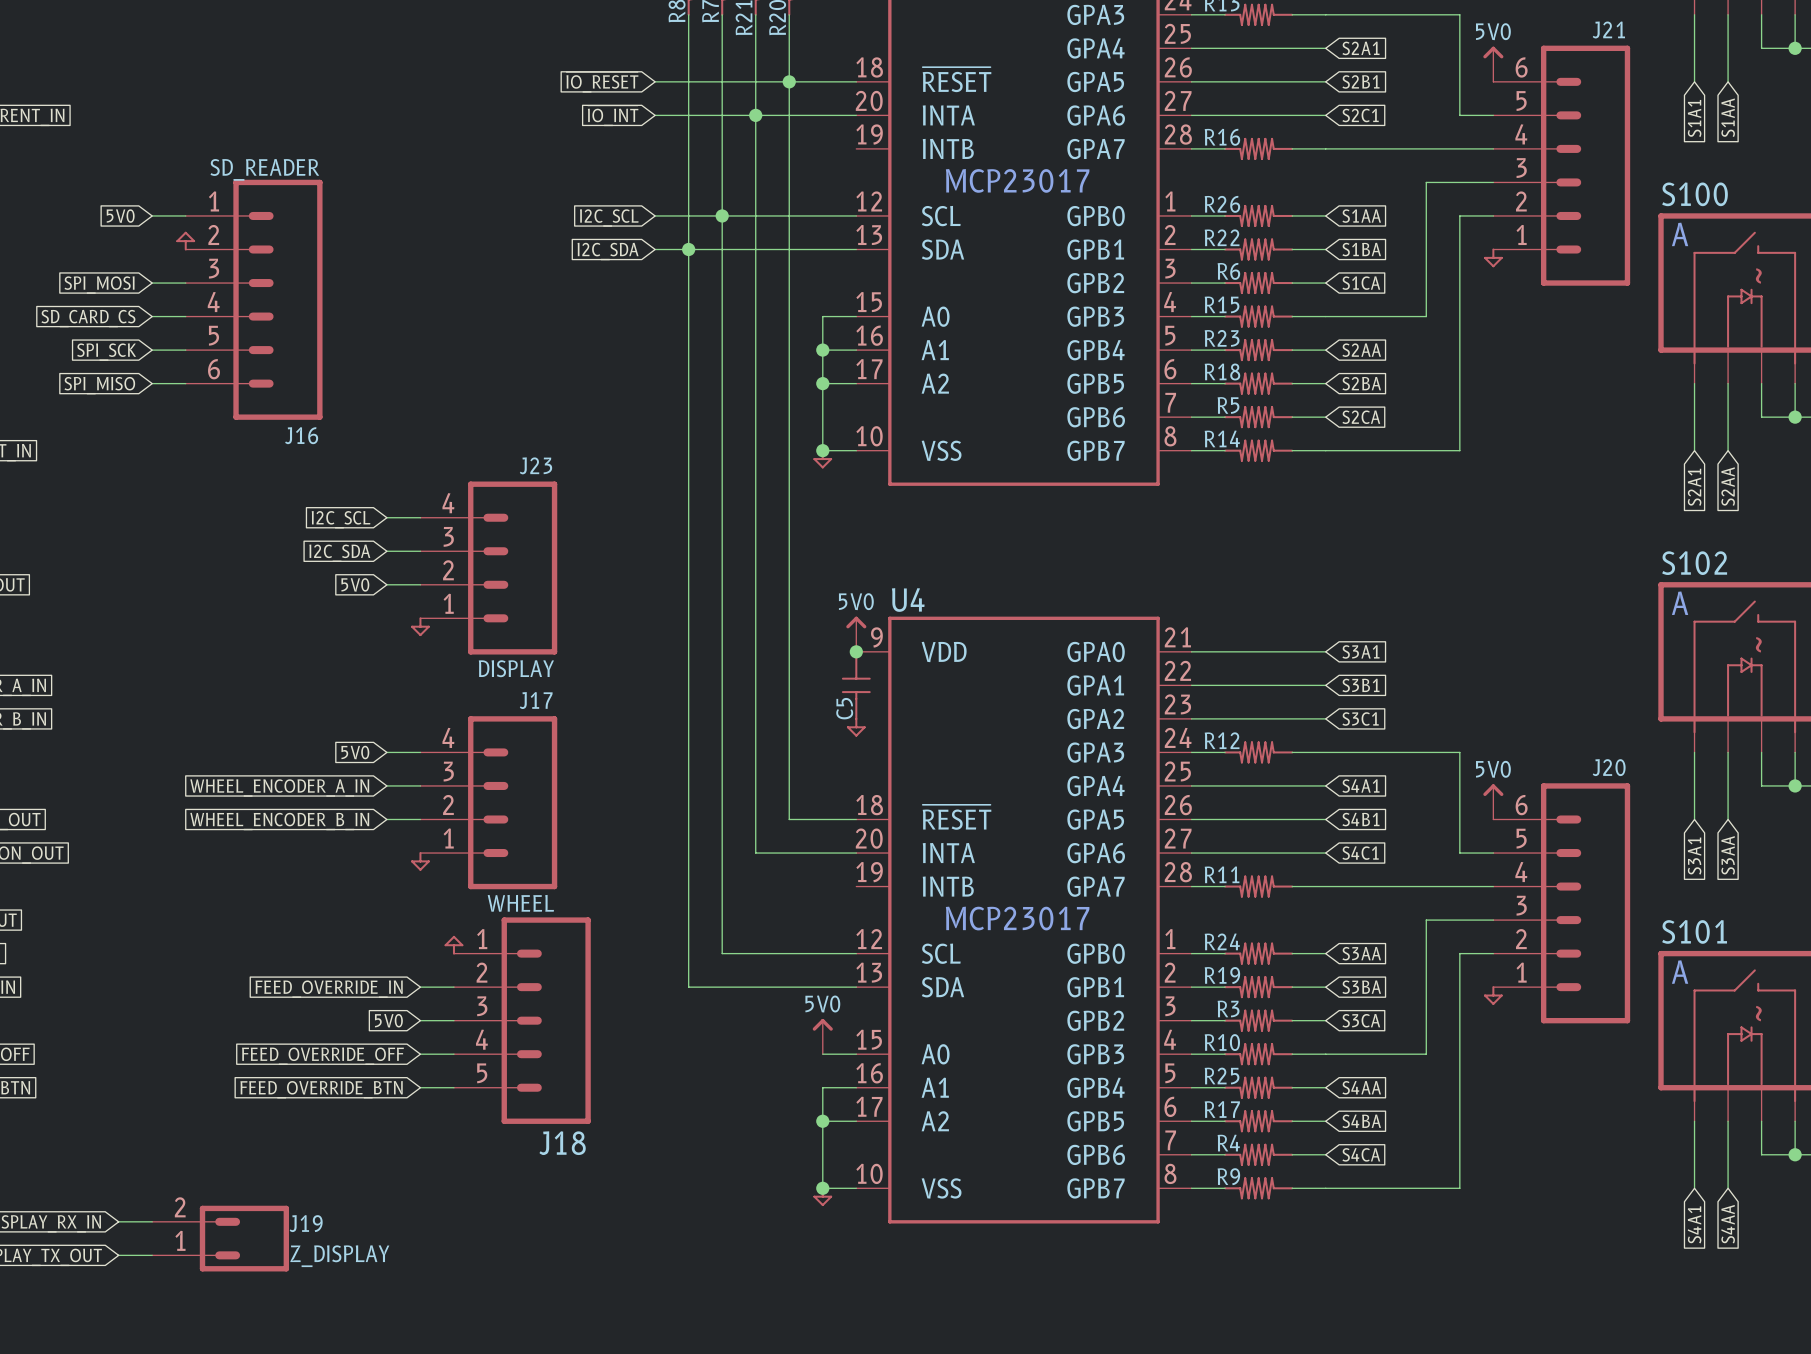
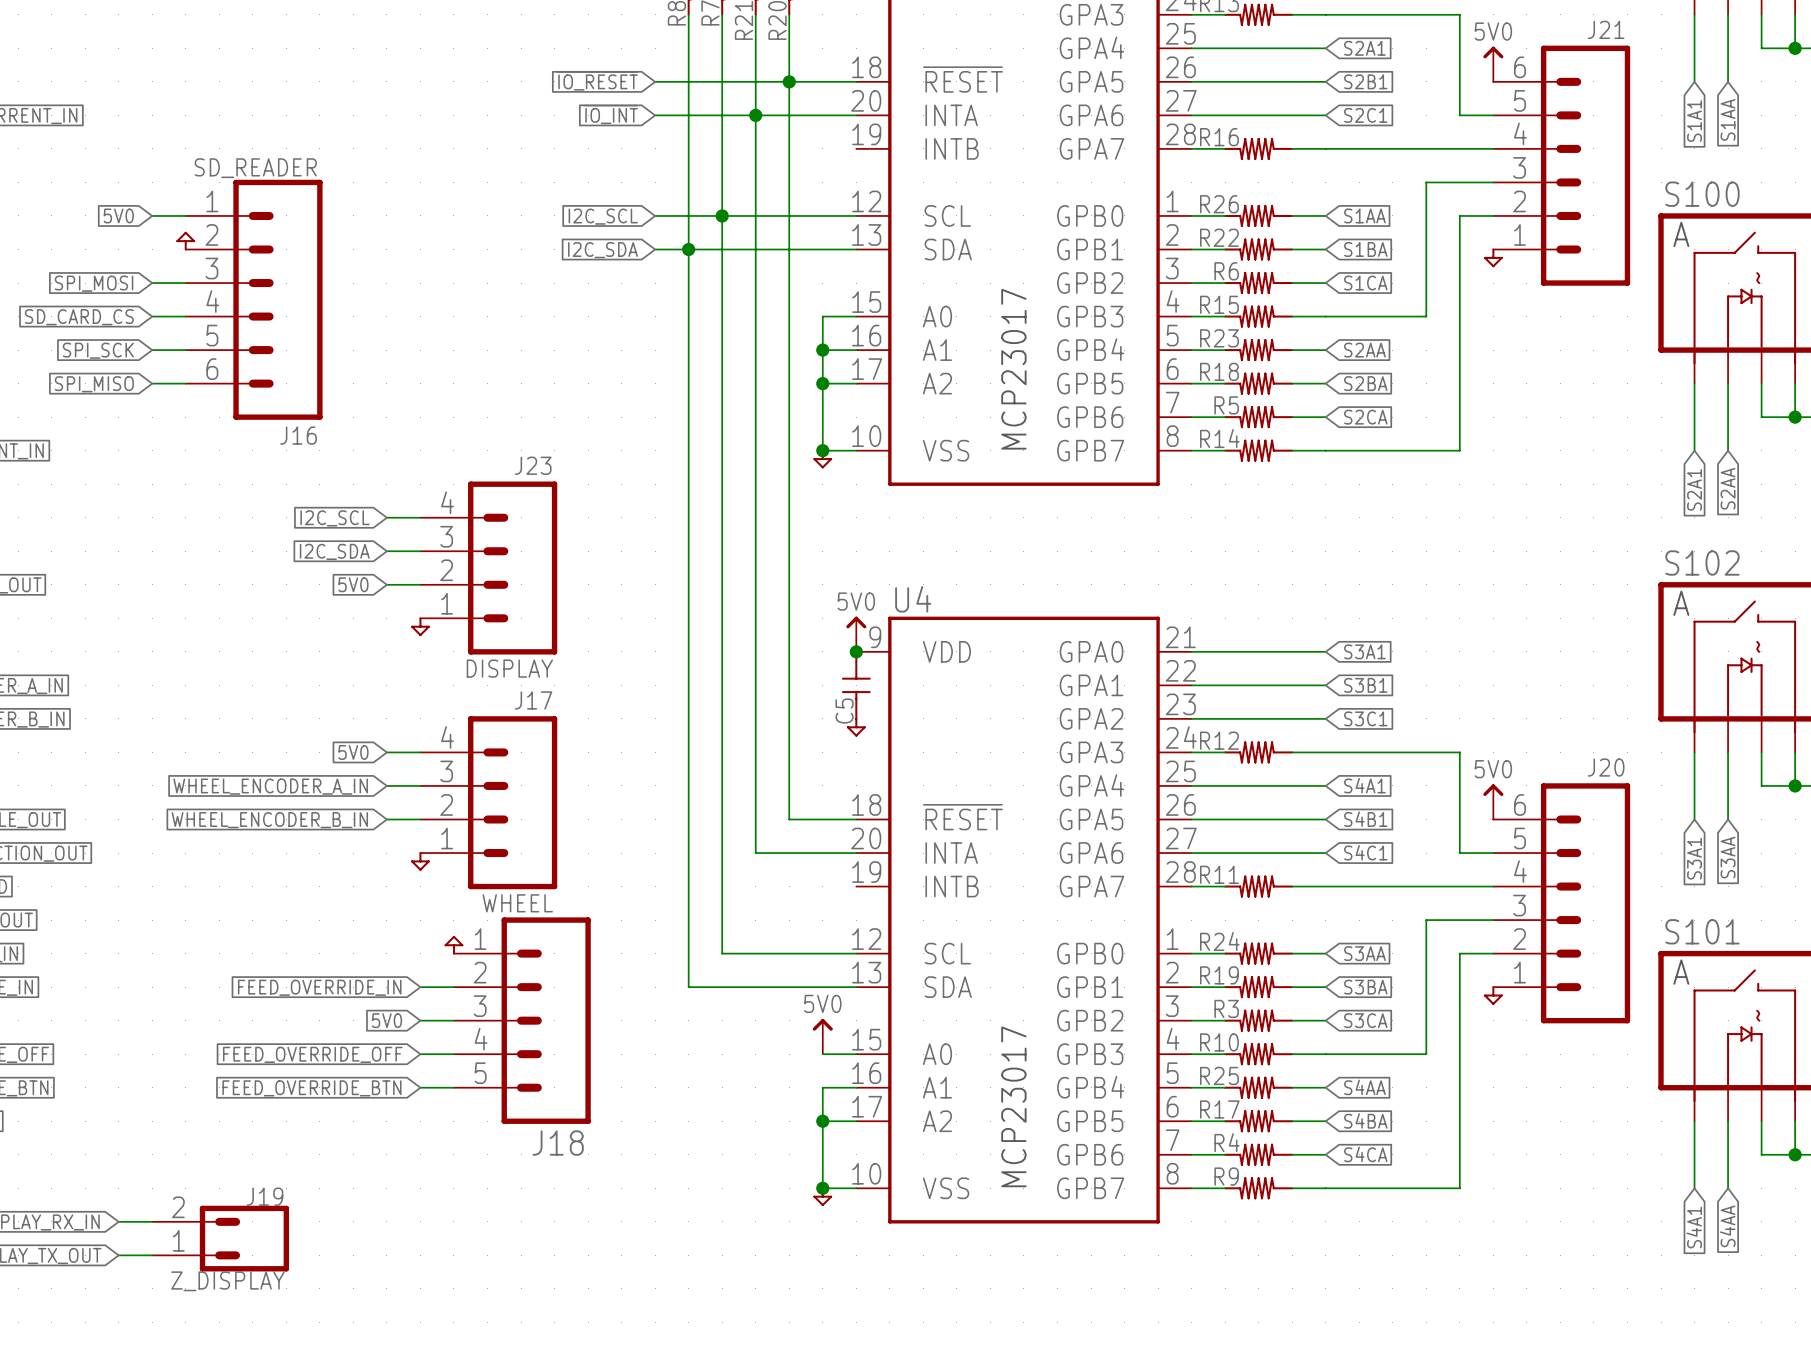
part text rotation: 0° (1017, 180) -> 90° counterclockwise (1013, 369)
part text position: MCP23017 (1017, 180) -> MCP23017 (1013, 369)
U4 text rotation: 0° (1017, 918) -> 90° counterclockwise (1013, 1106)
U4 text position: MCP23017 (1017, 918) -> MCP23017 (1013, 1106)
J19 name position: J19 (306, 1223) -> J19 (264, 1196)
J19 value position: Z_DISPLAY (339, 1256) -> Z_DISPLAY (227, 1281)

